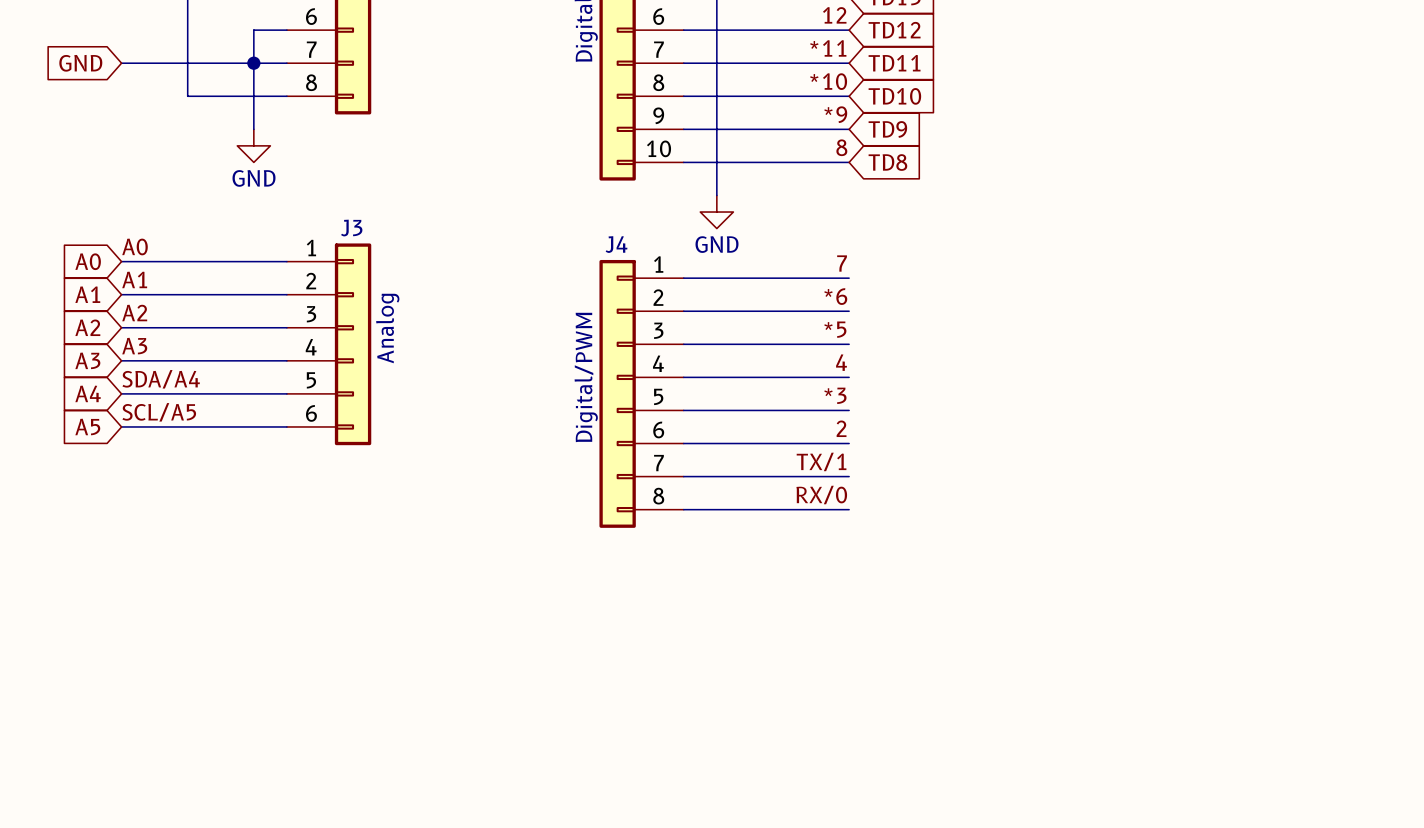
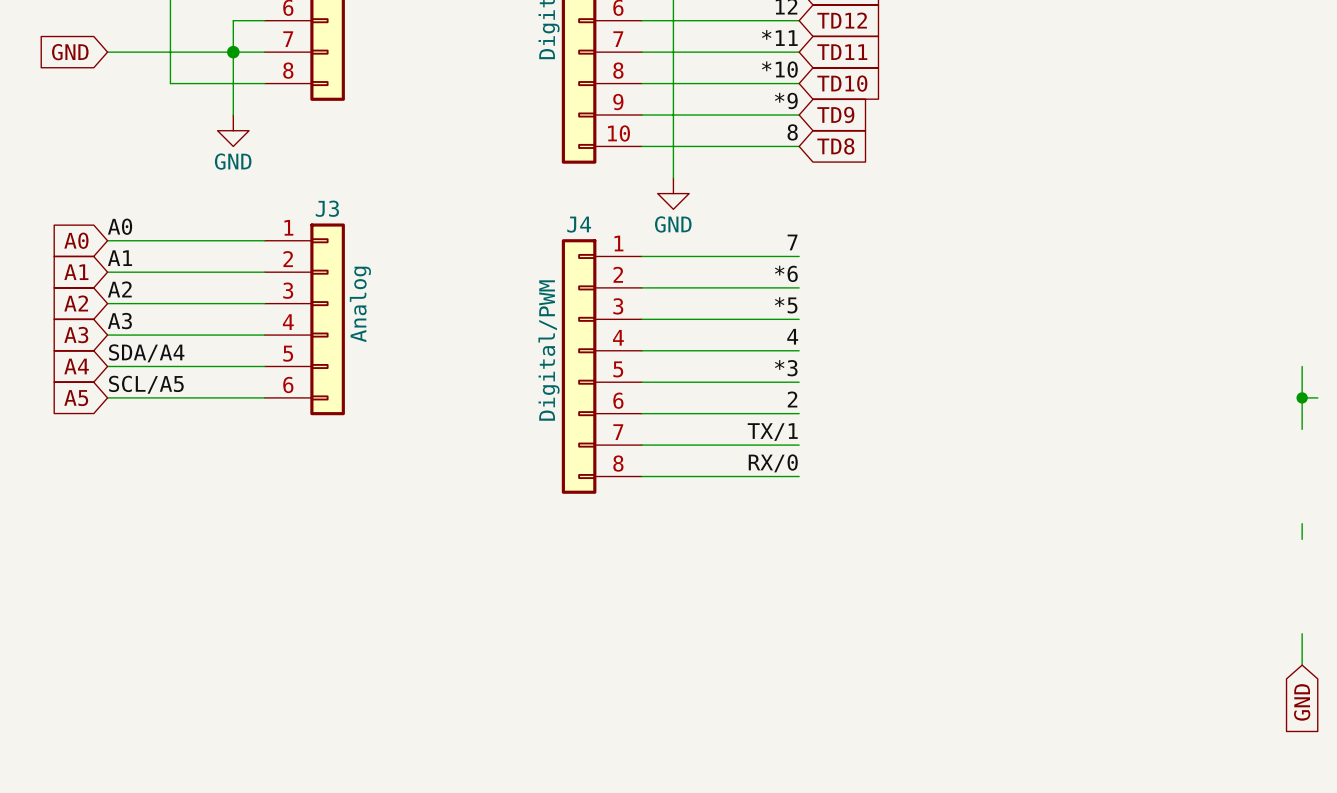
wire: none -> (1302, 366) (1302, 429)
wire: none -> (1302, 397) (1317, 397)
junction: none -> (1302, 397)
wire: none -> (1302, 523) (1302, 539)
wire: none -> (1302, 633) (1302, 665)
global label: none -> GND (1302, 702)

